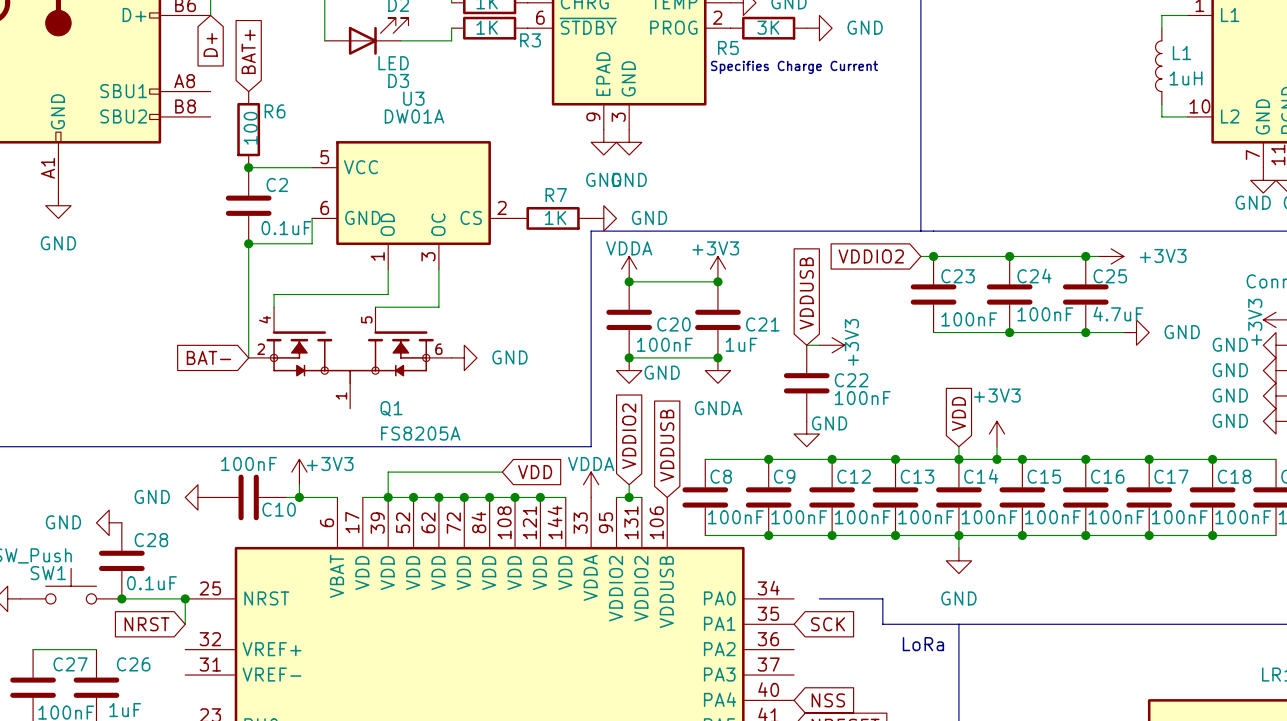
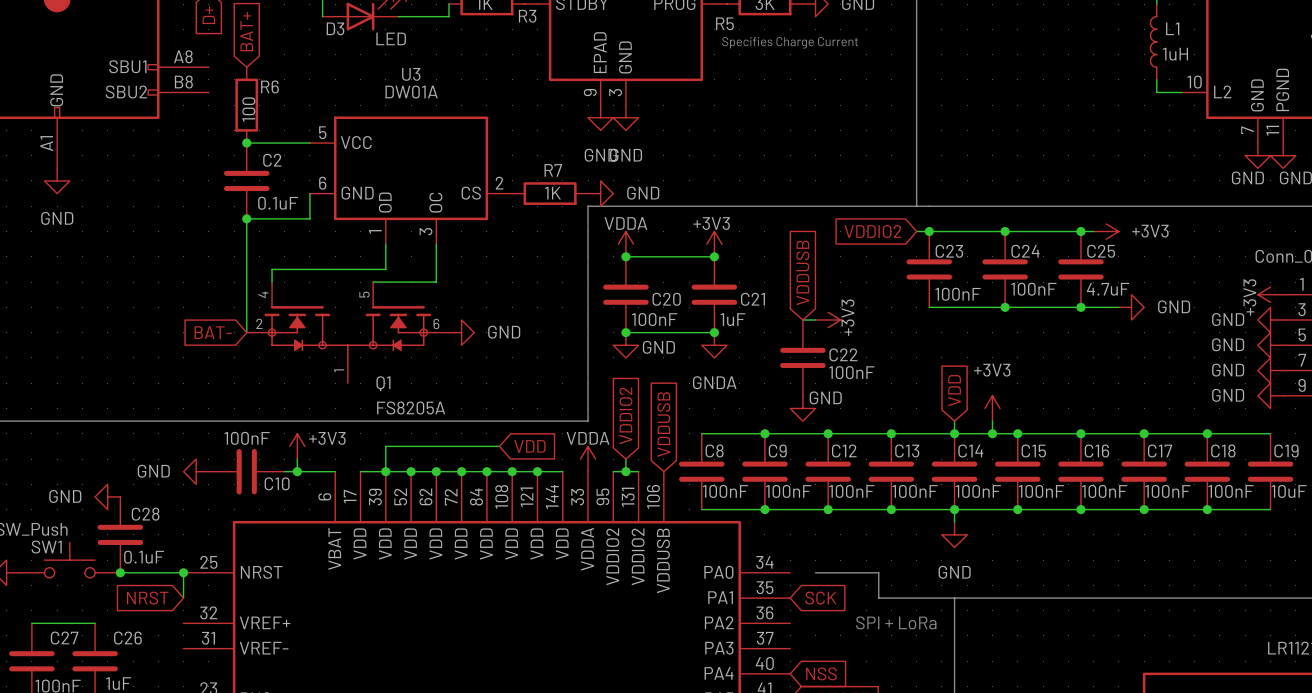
D3 name position: D3 (398, 80) -> D3 (335, 28)
text: LoRa (923, 644) -> none
text: none -> SPI + LoRa (896, 622)

